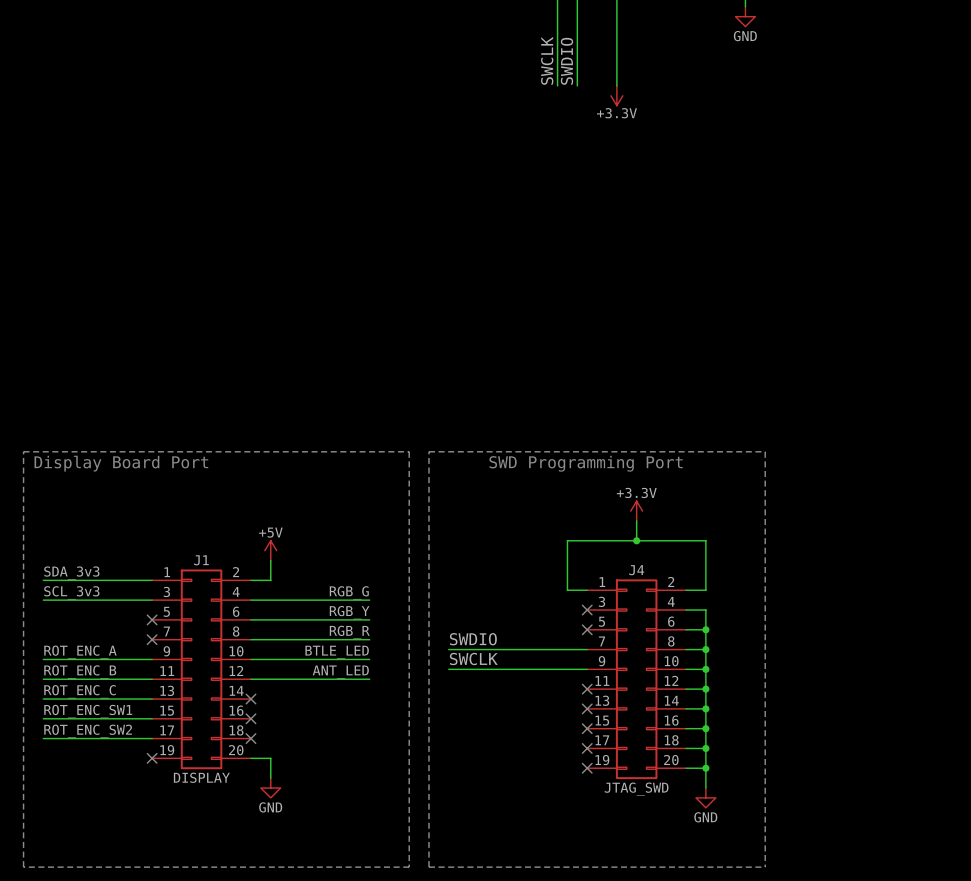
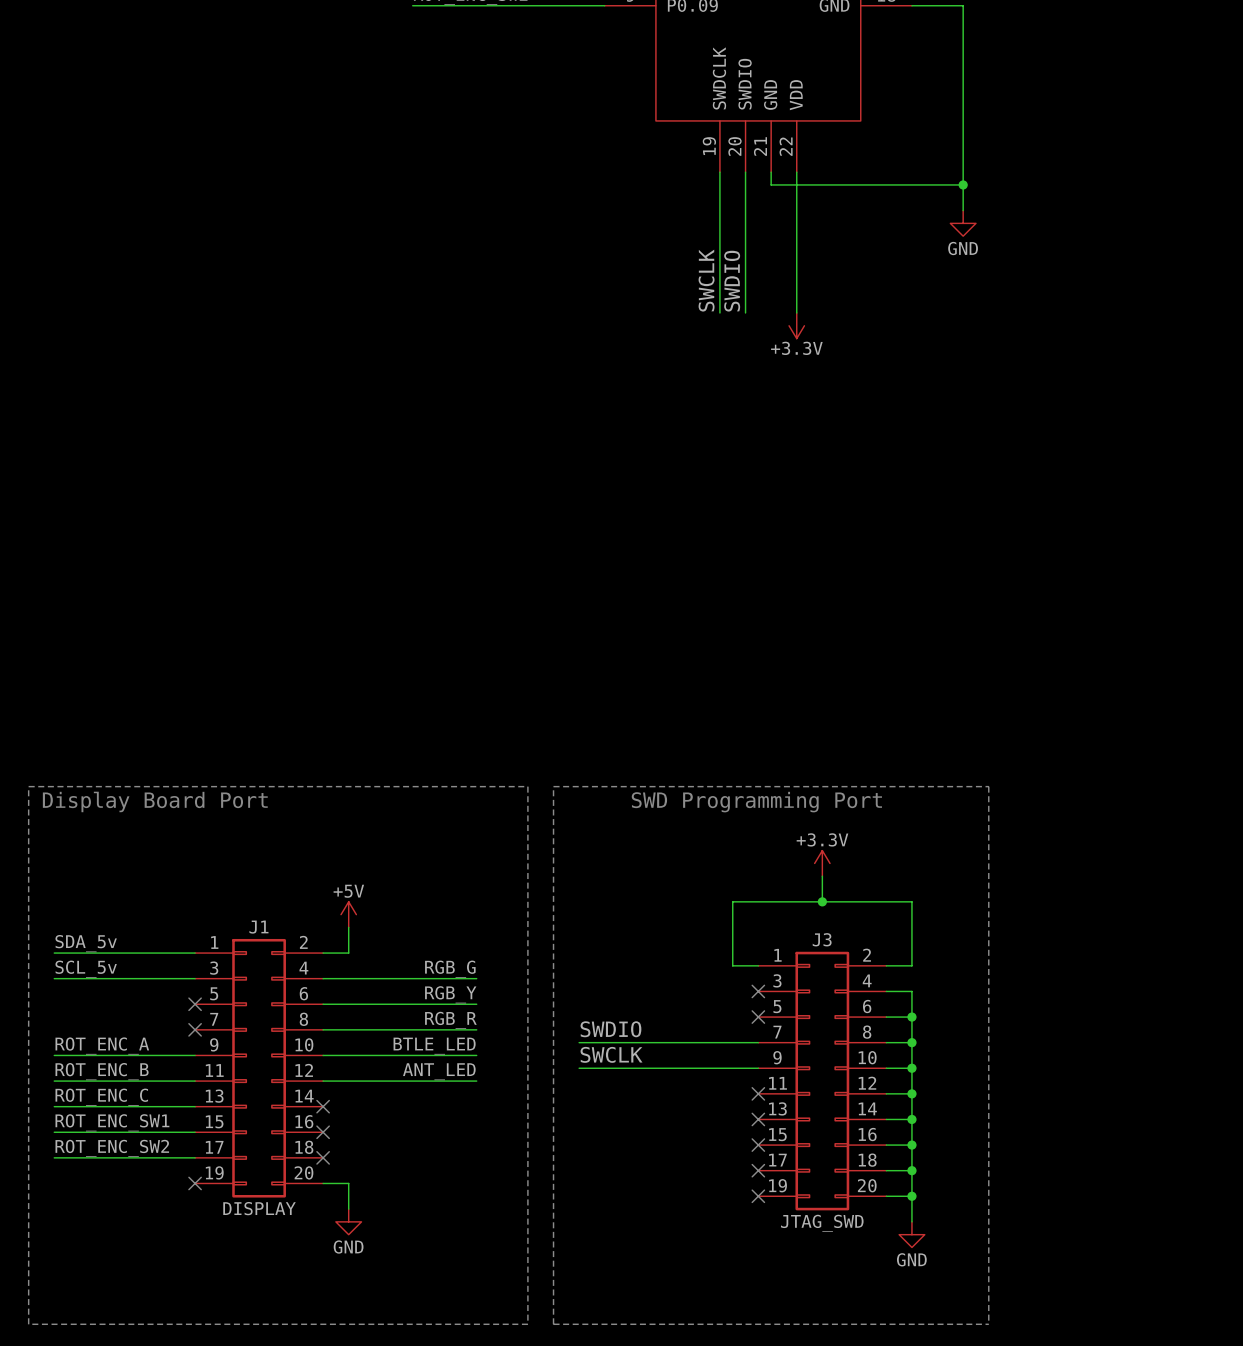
J4 name: J4 (636, 570) -> J3 (822, 939)
label: SDA_3v3 (71, 573) -> SDA_5v (86, 943)
label: SCL_3v3 (71, 592) -> SCL_5v (86, 969)

